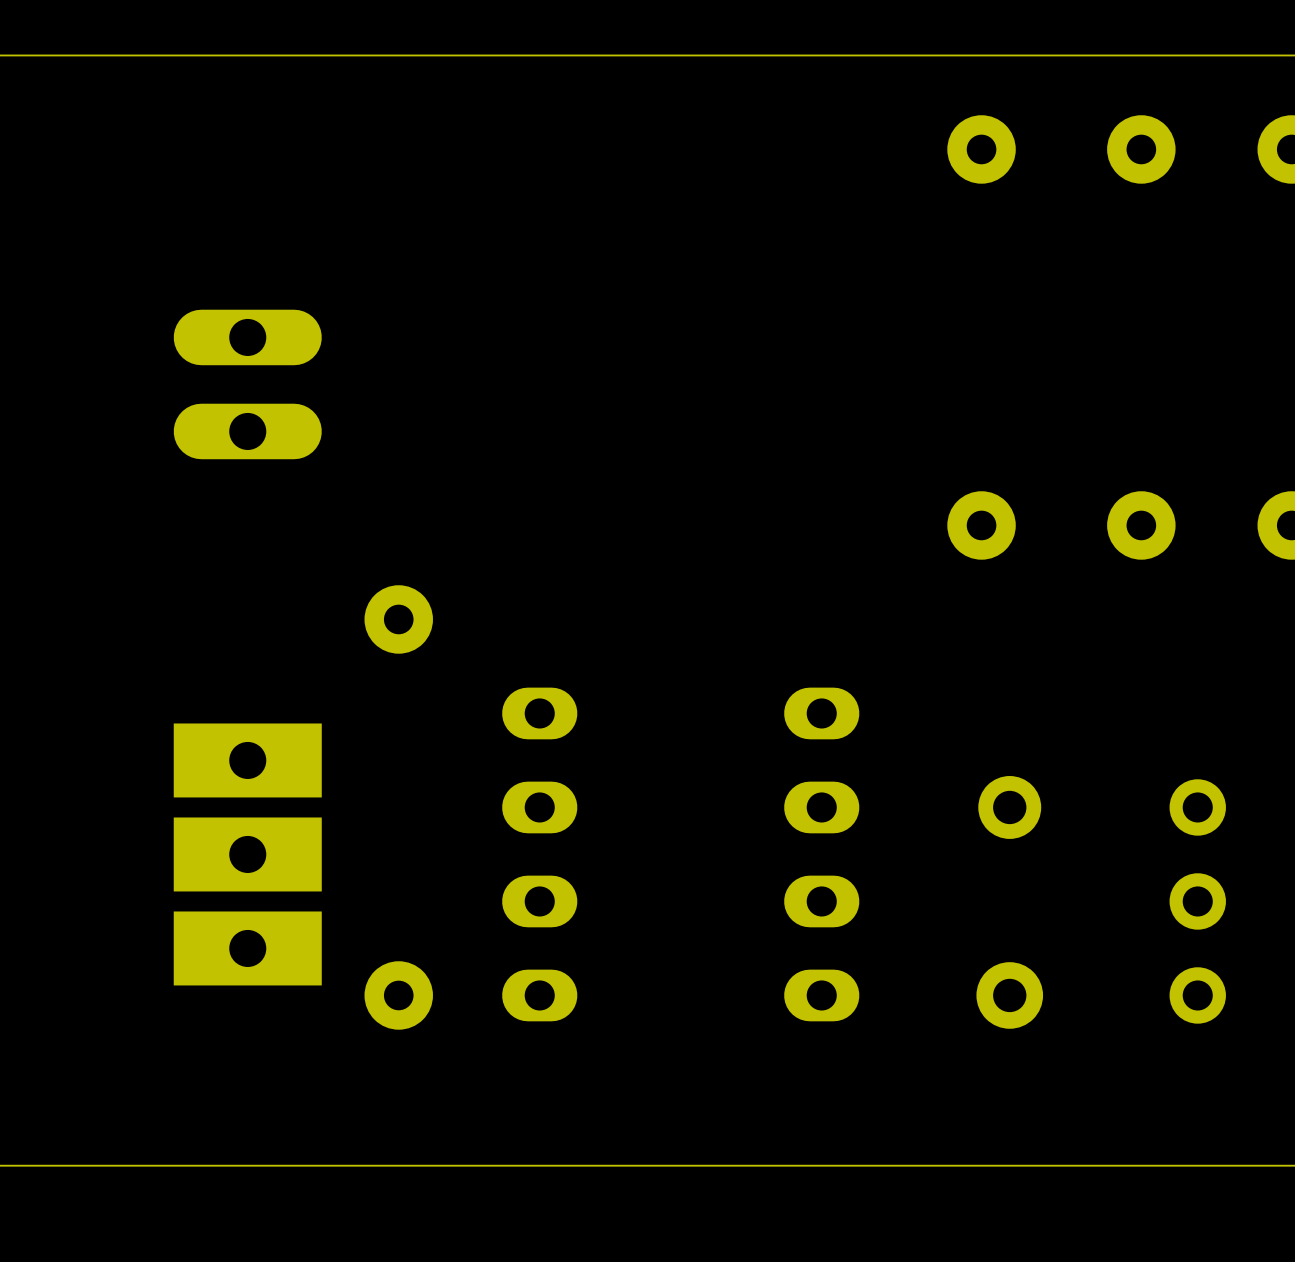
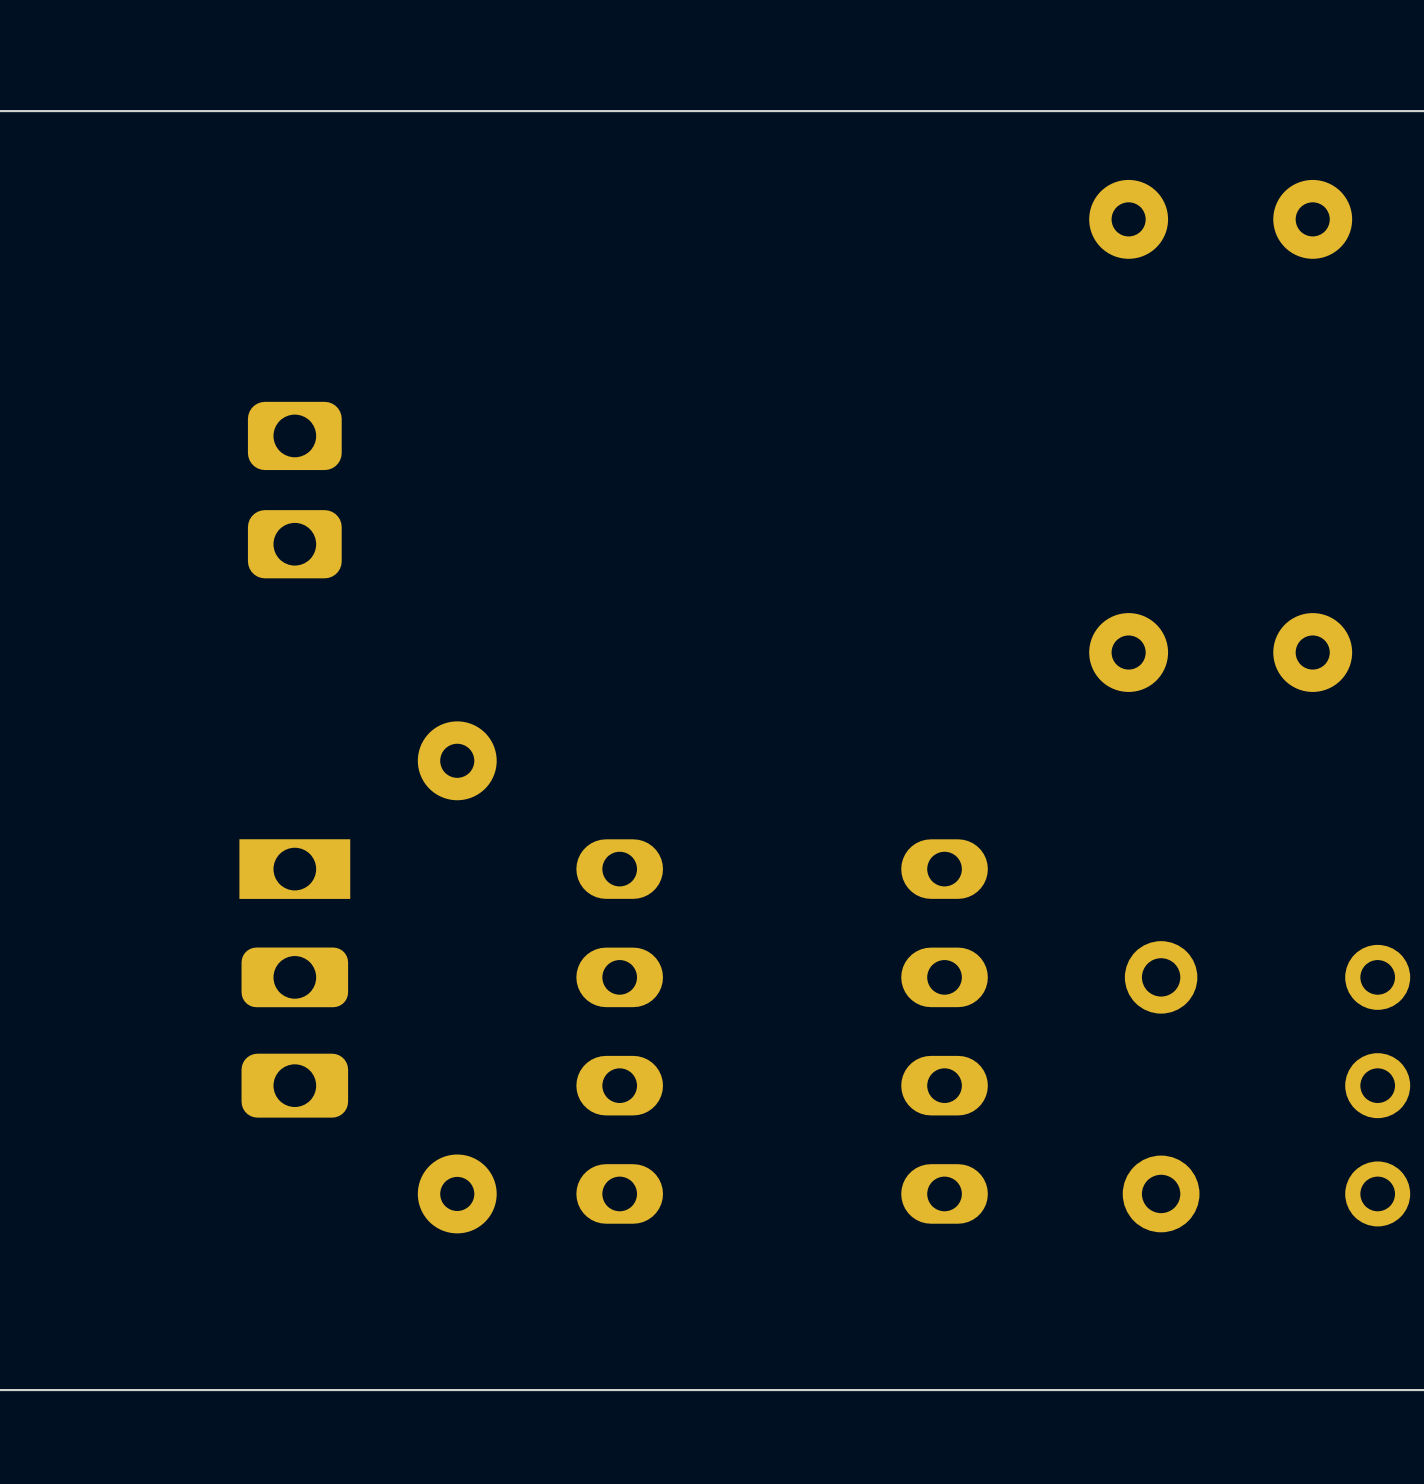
part footprint: [173, 309, 322, 460] -> [247, 401, 342, 579]
part: none -> (294, 978)
part: (247, 854) -> none

